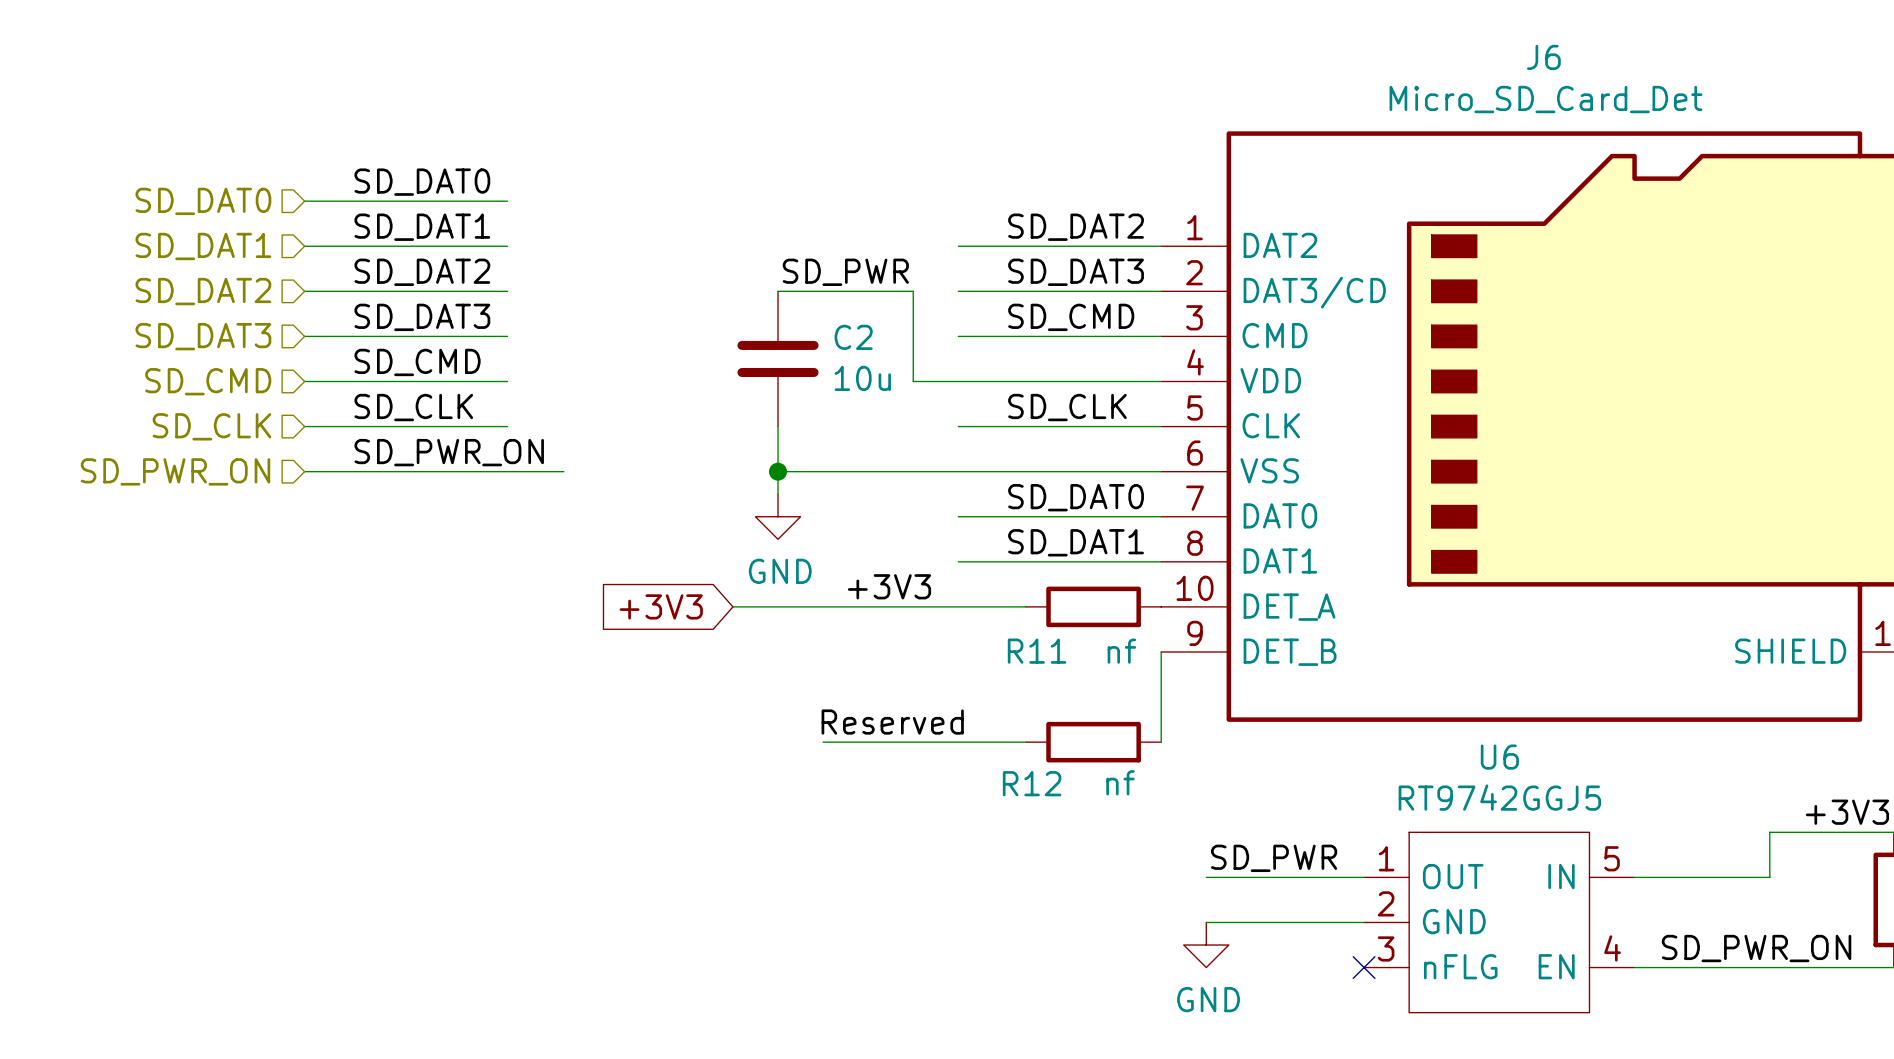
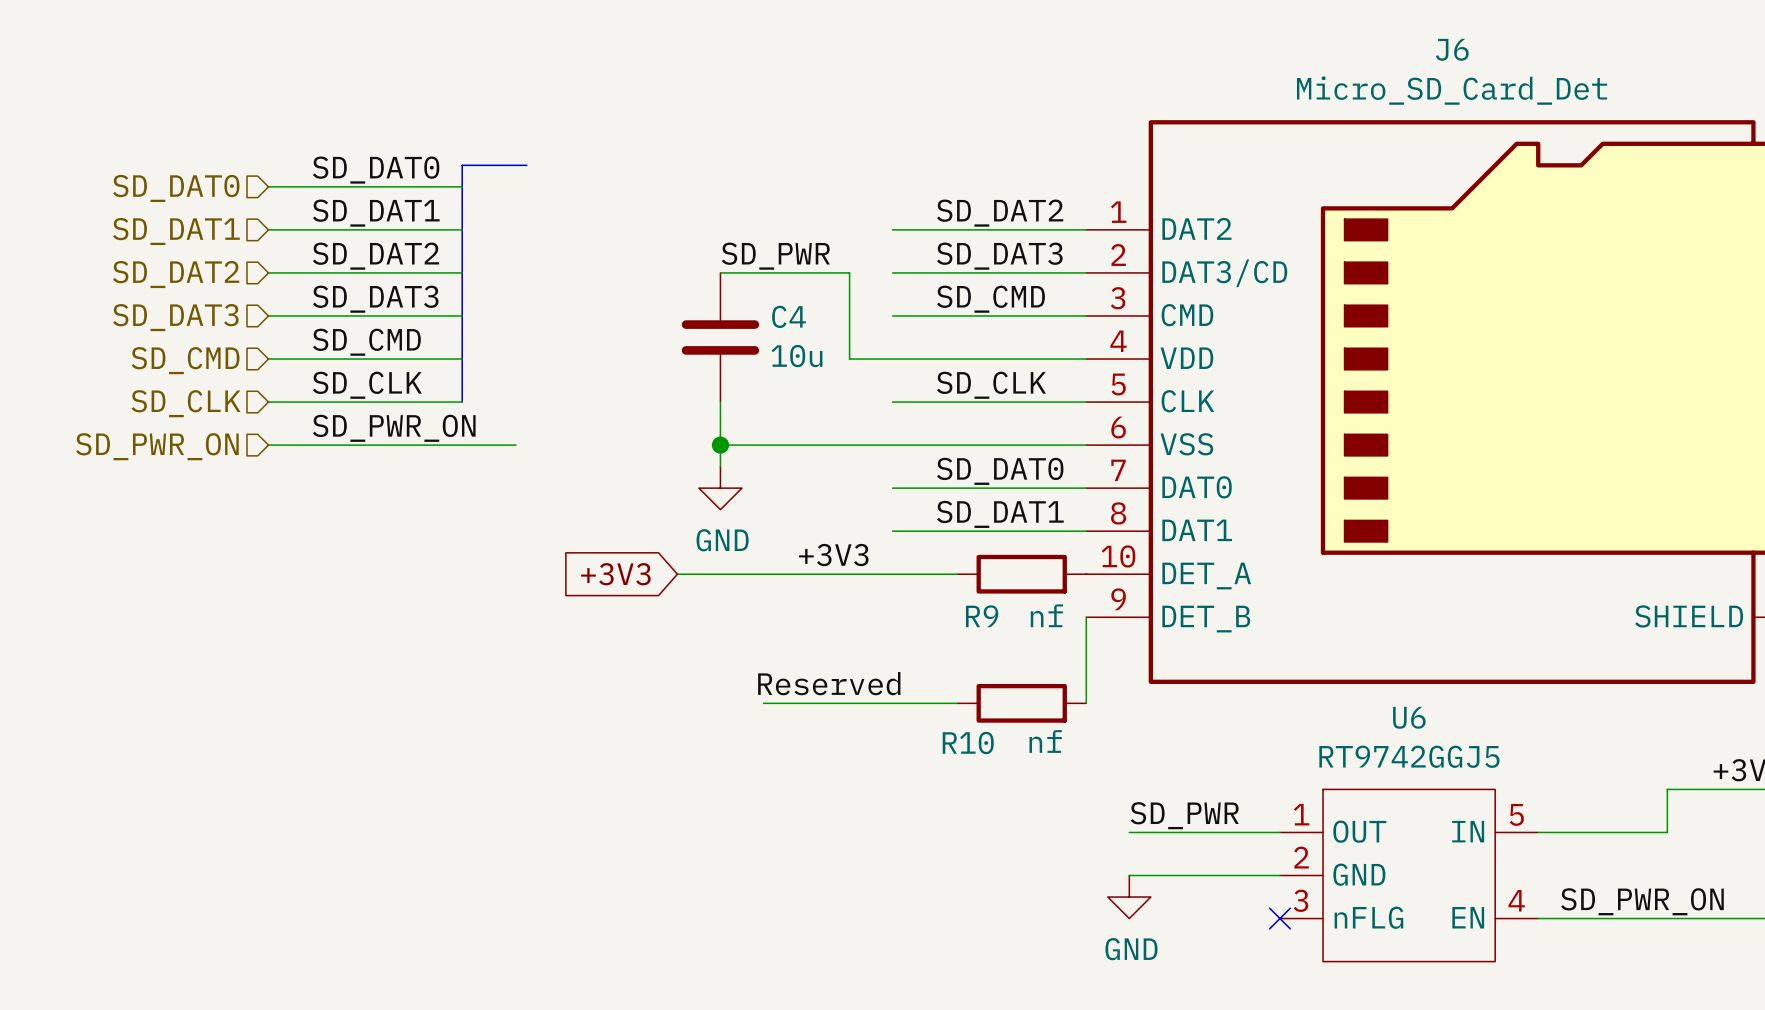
bus: none -> (526, 165) (462, 165) (462, 402)
C2 name: C2 (853, 337) -> C4 (788, 316)
R11 name: R11 (1037, 651) -> R9 (982, 616)
R12 name: R12 (1032, 783) -> R10 (968, 742)

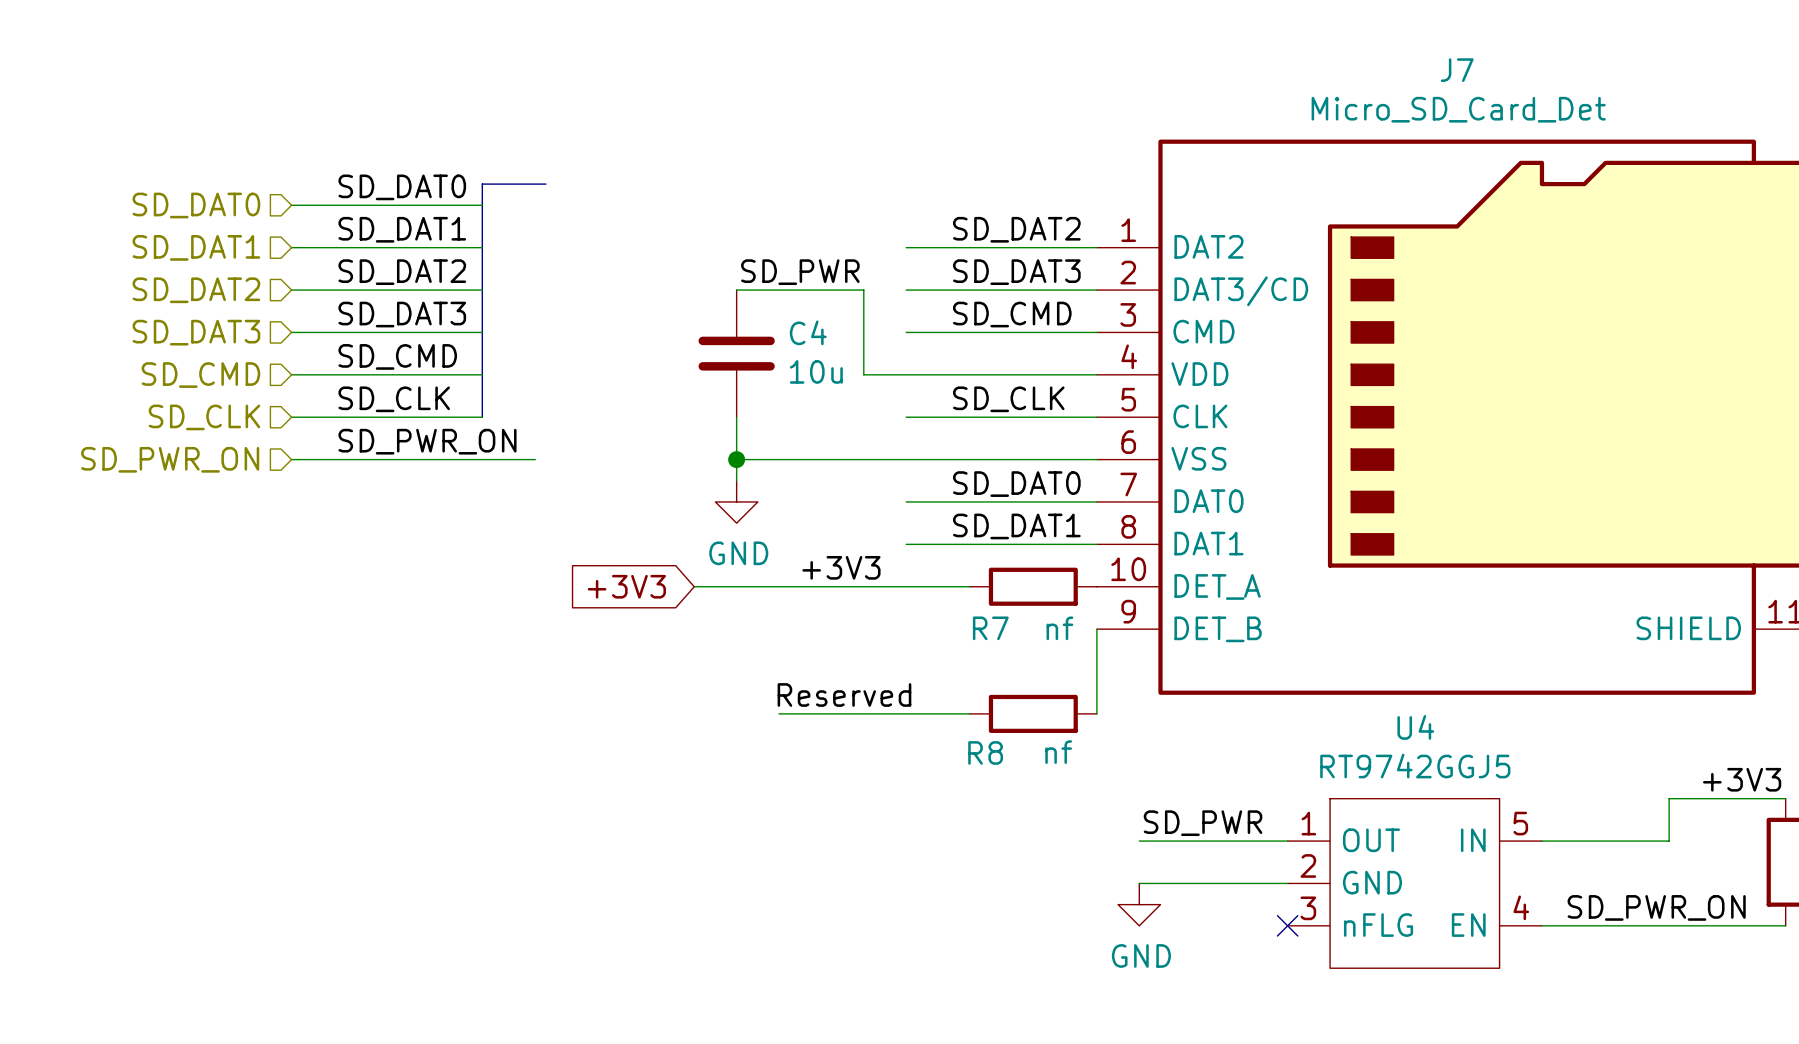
J6 name: J6 (1452, 49) -> J7 (1457, 70)
R9 name: R9 (982, 616) -> R7 (990, 628)
U6 name: U6 (1409, 717) -> U4 (1415, 727)
R10 name: R10 (968, 742) -> R8 (985, 752)

